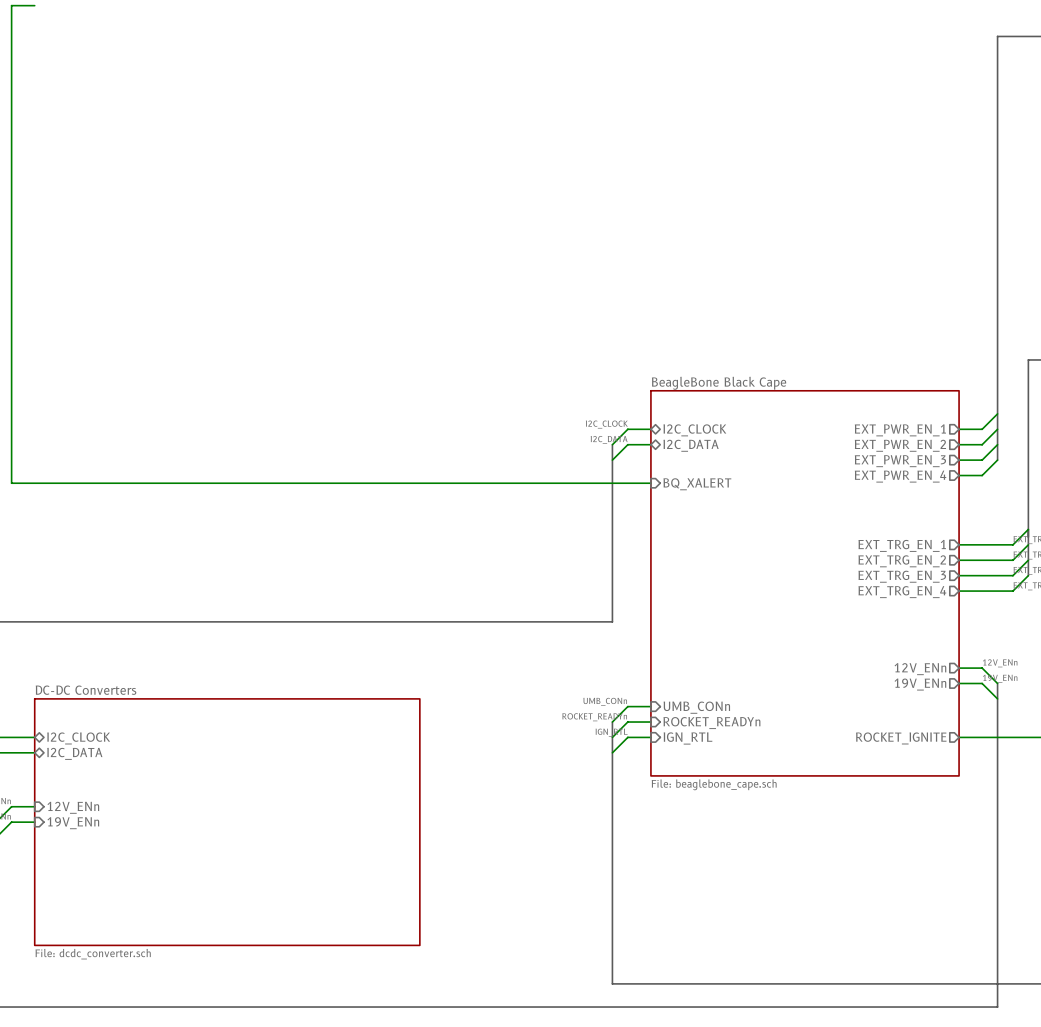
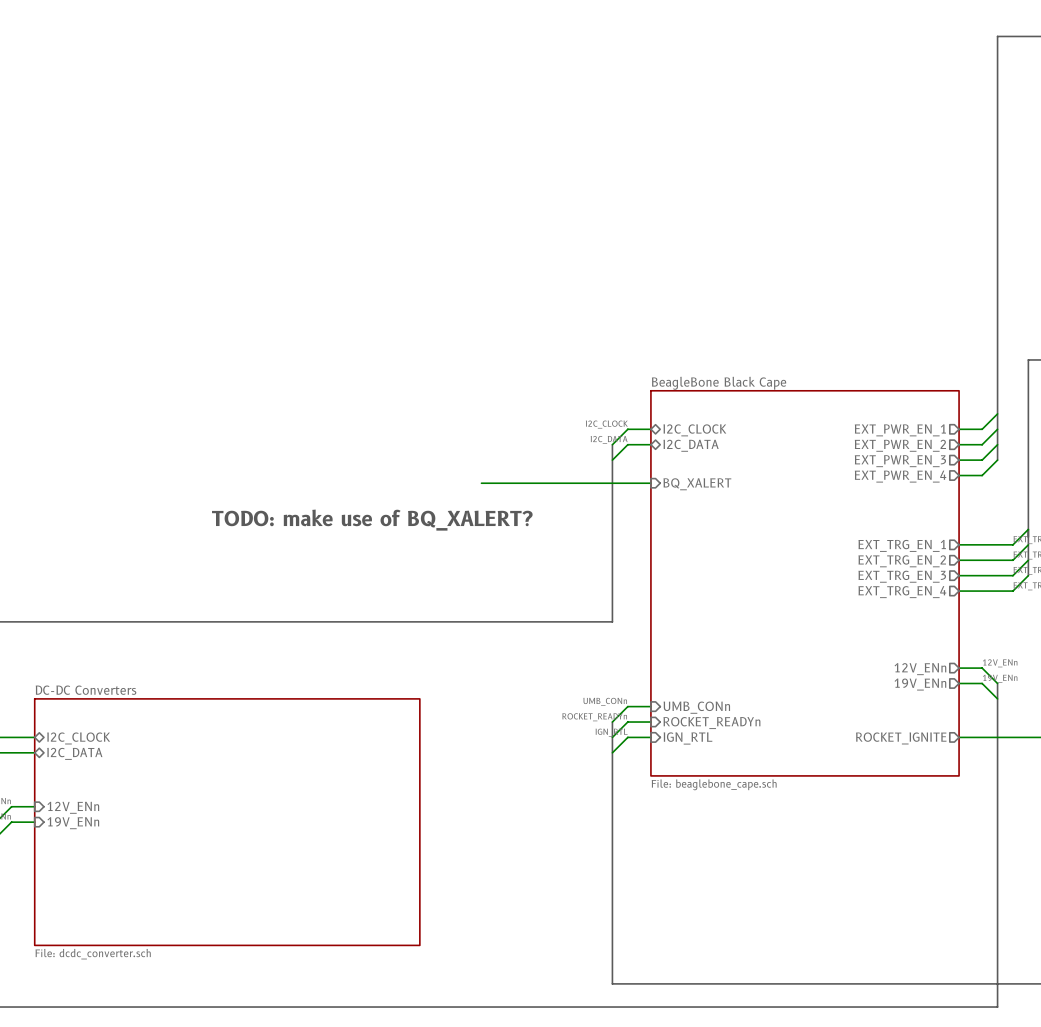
wire: (34, 5) (11, 5) (11, 483) (481, 483) -> none
text: none -> TODO: make use of BQ_XALERT? (372, 520)

